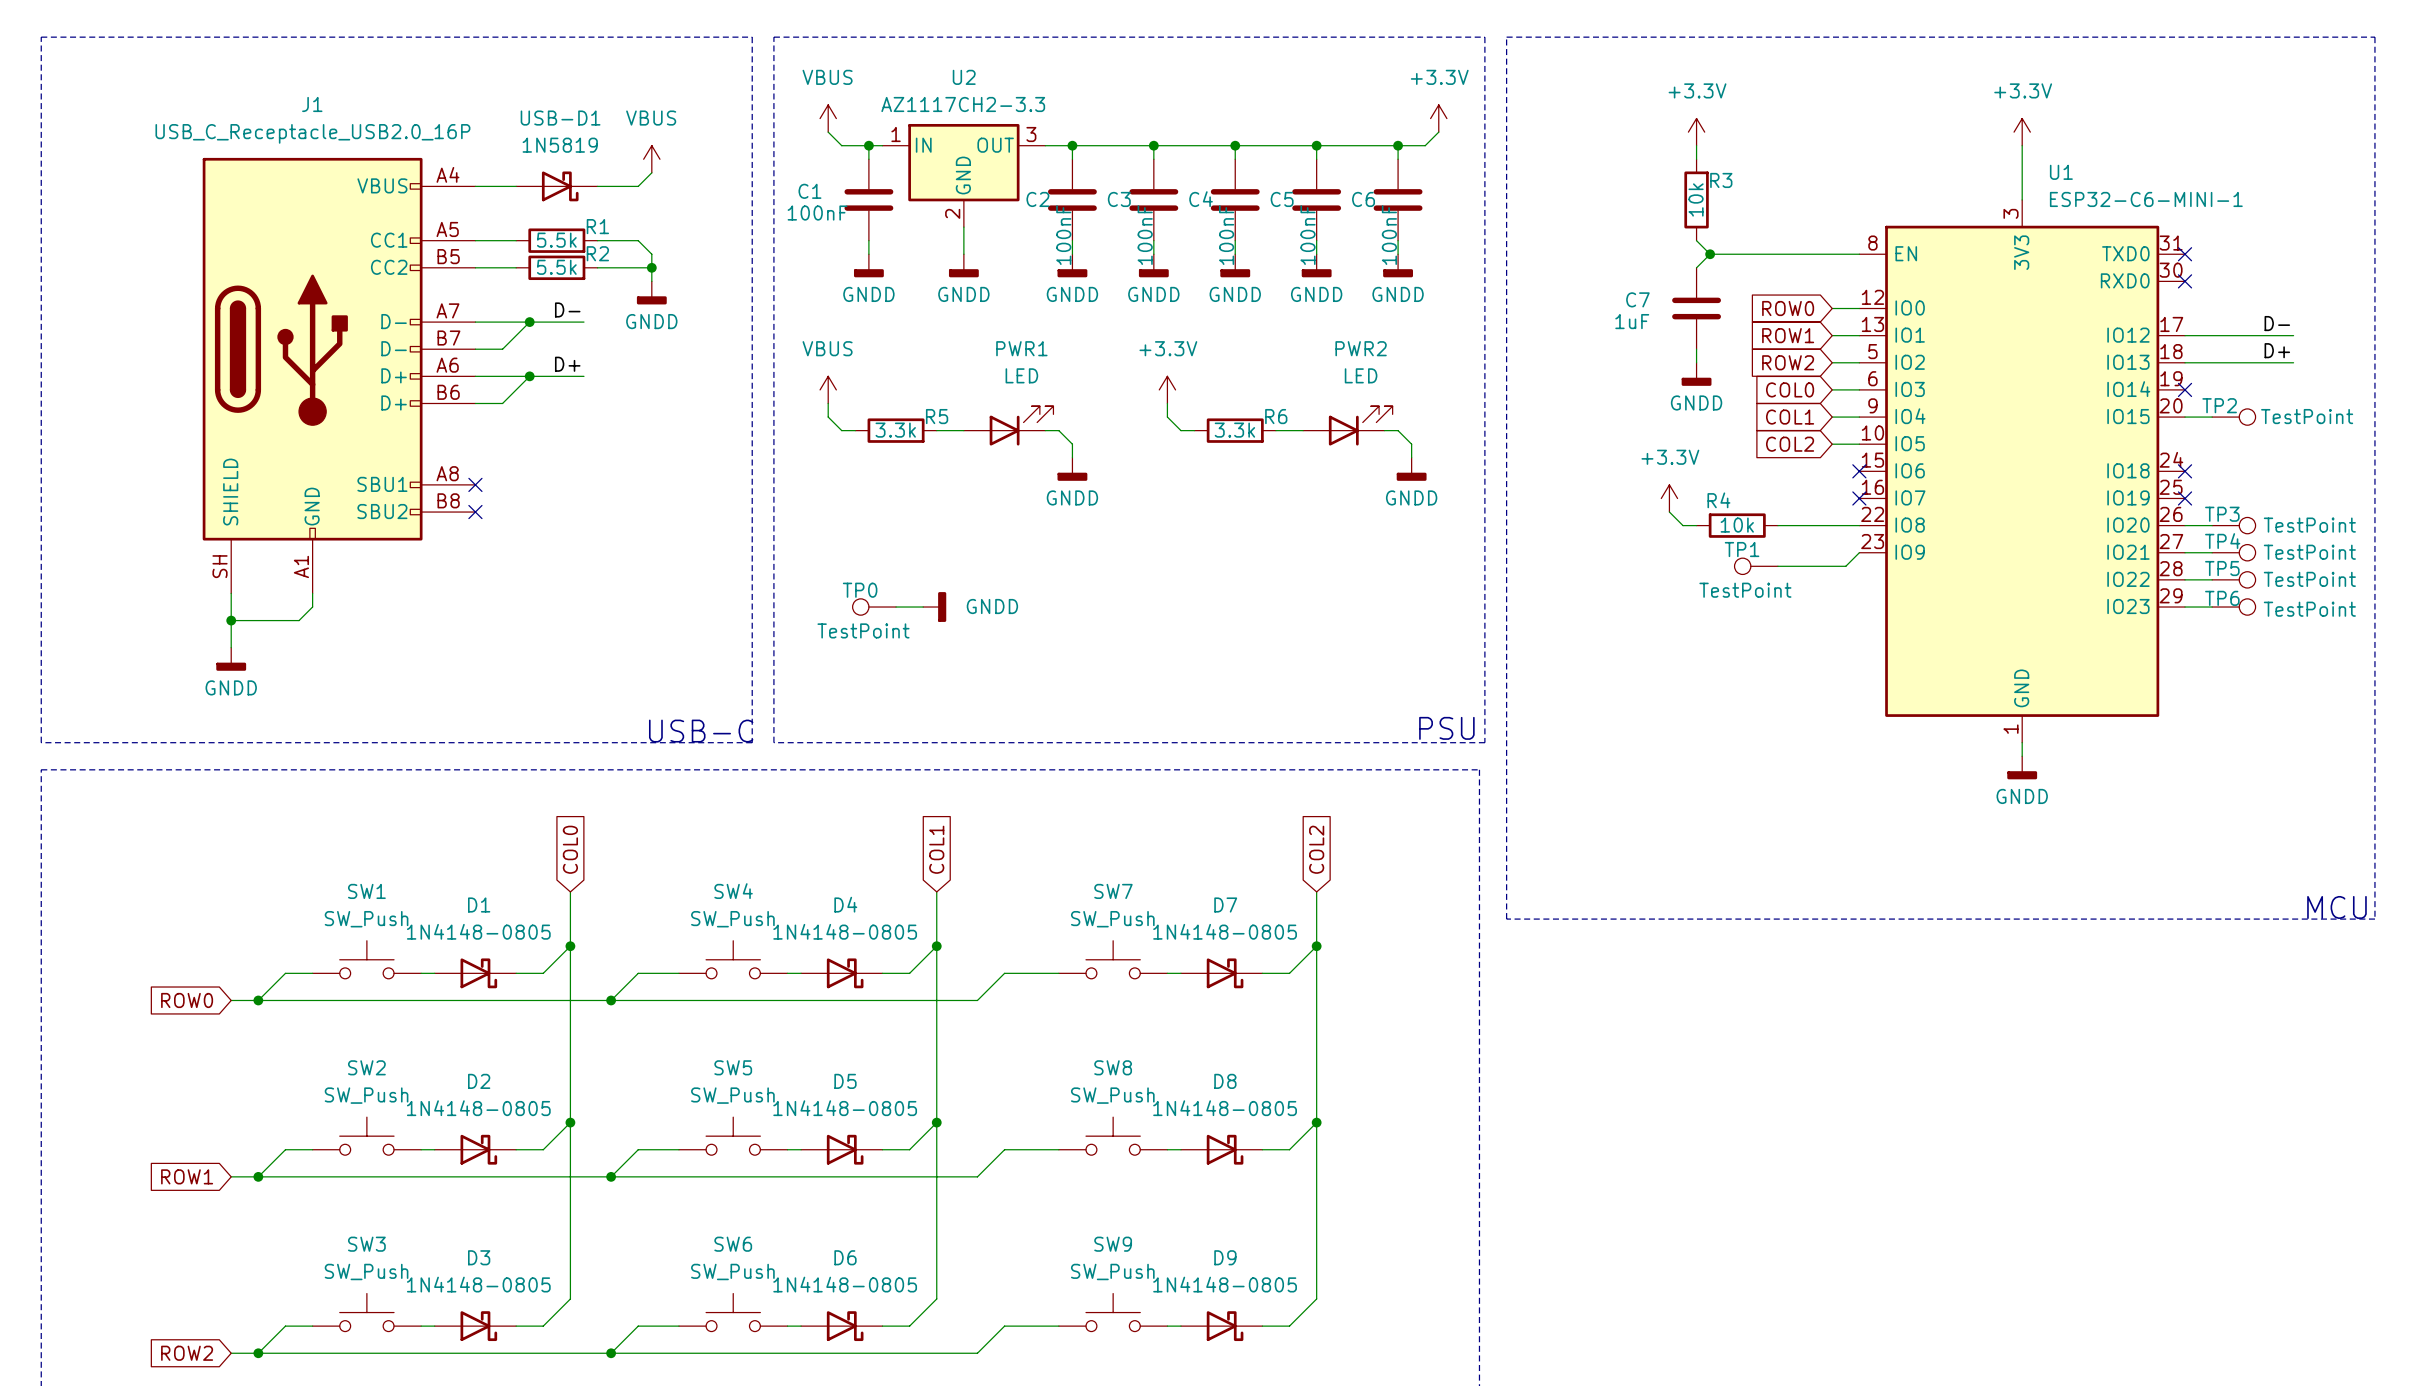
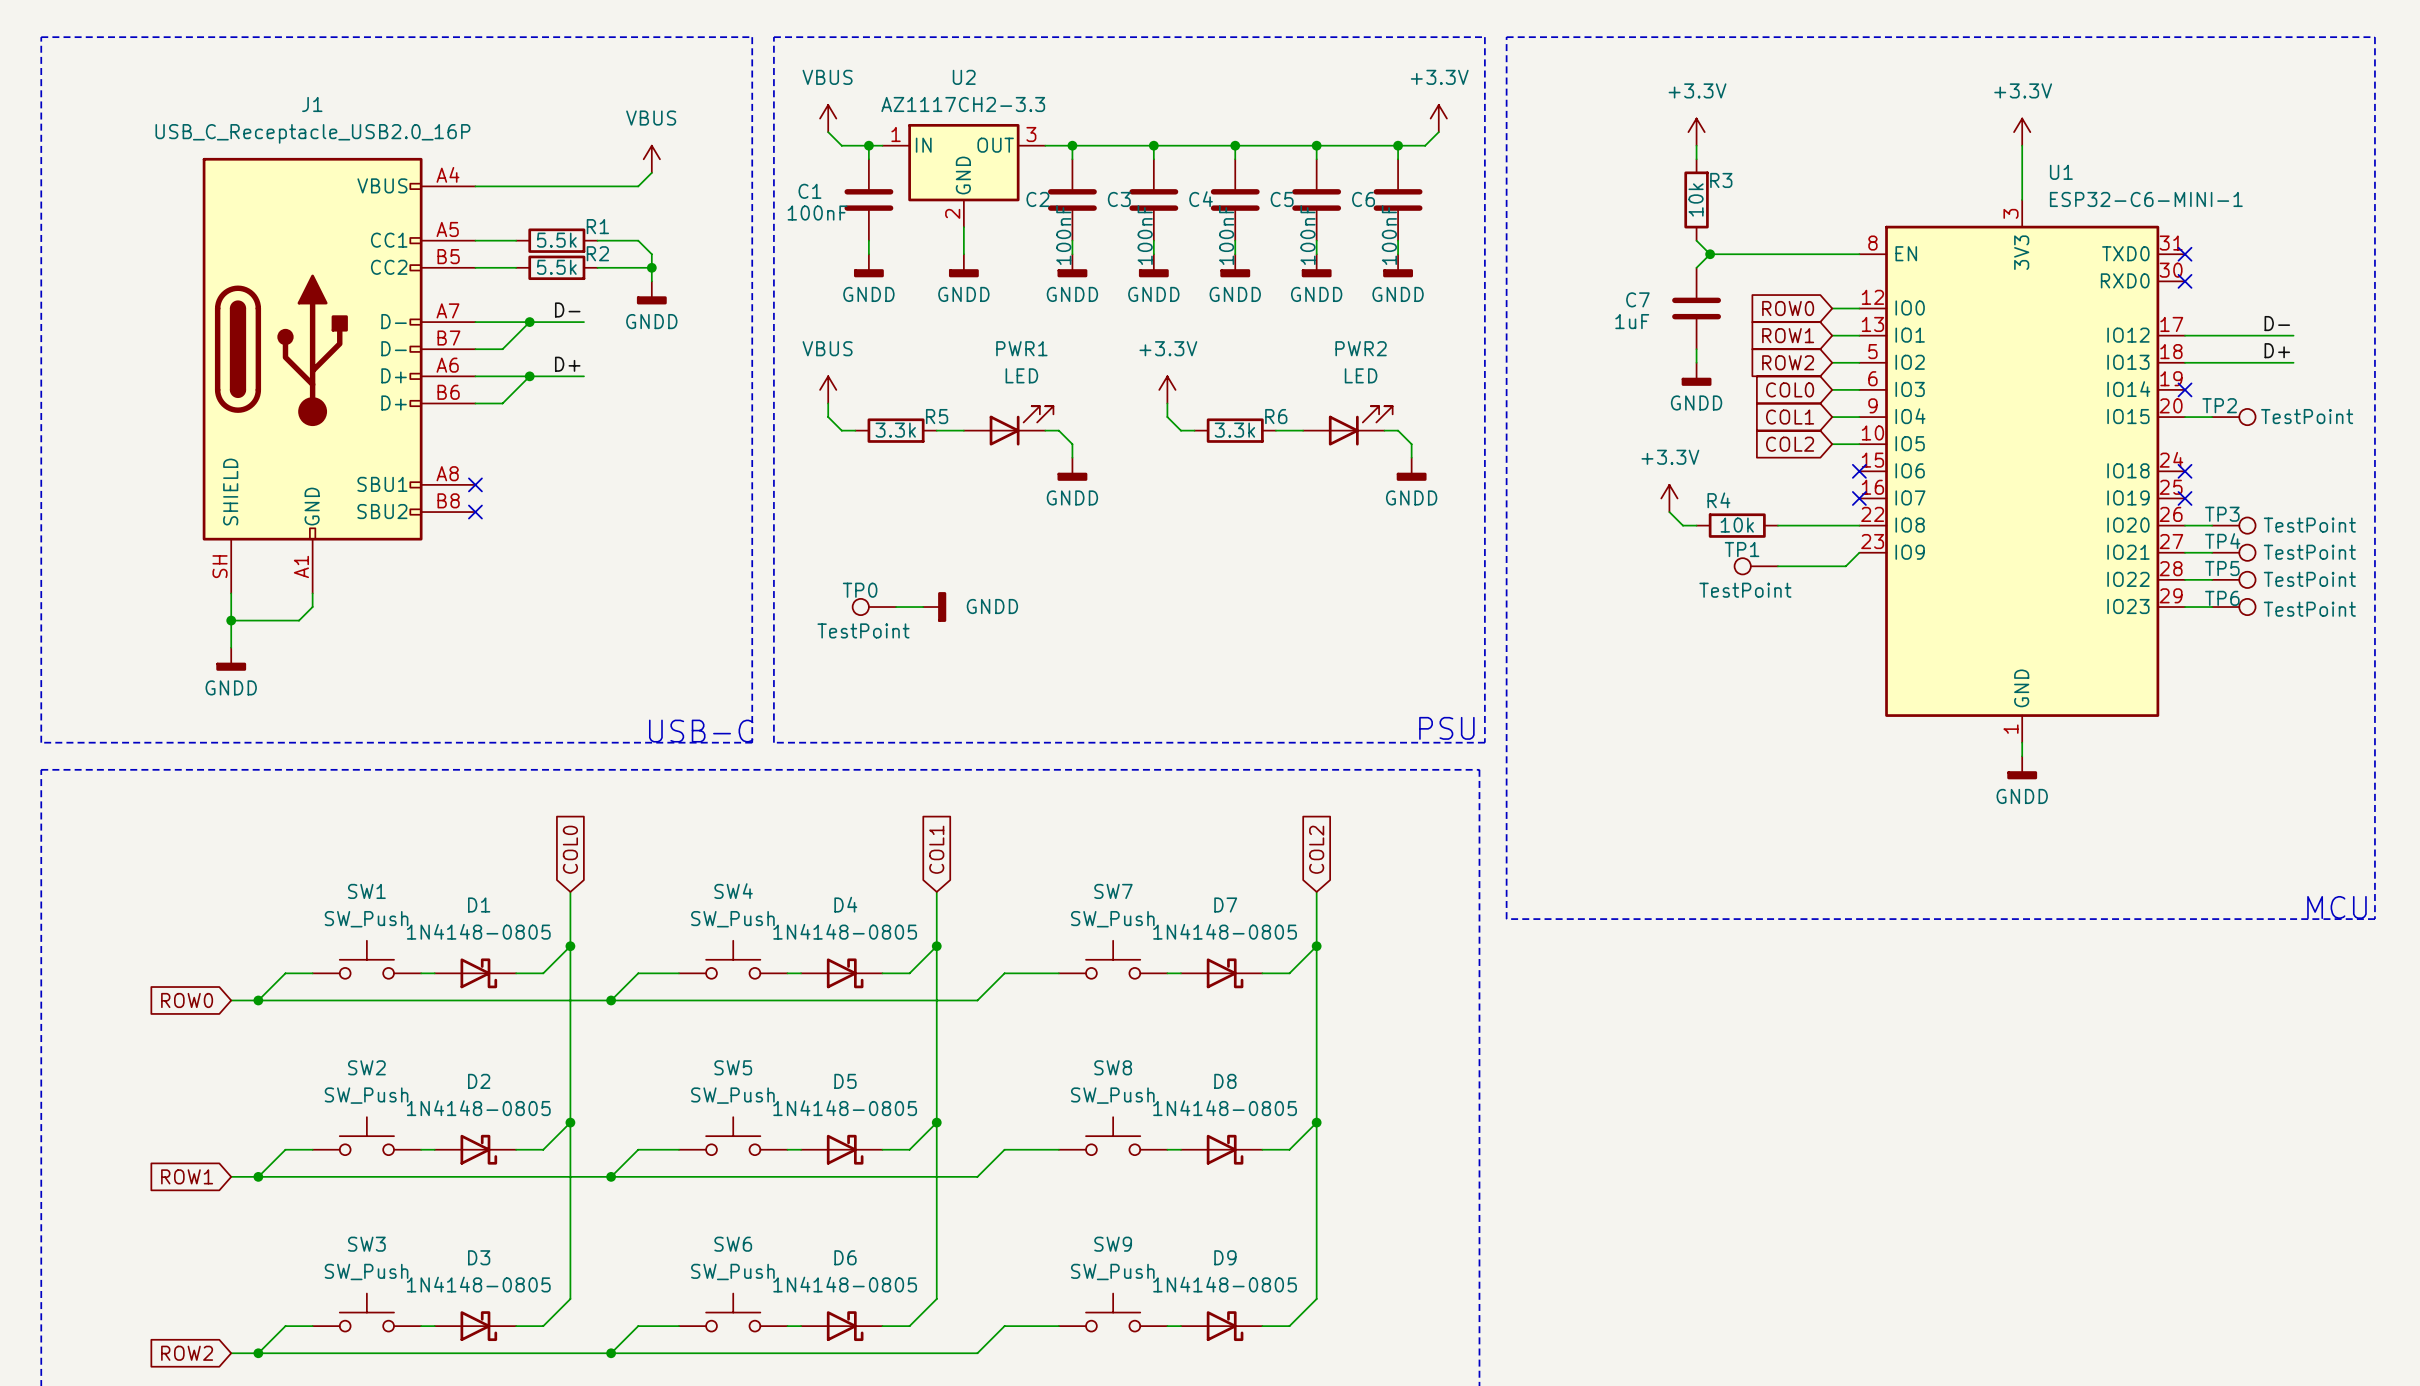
USB-D1: 1N5819 (556, 186) -> none

